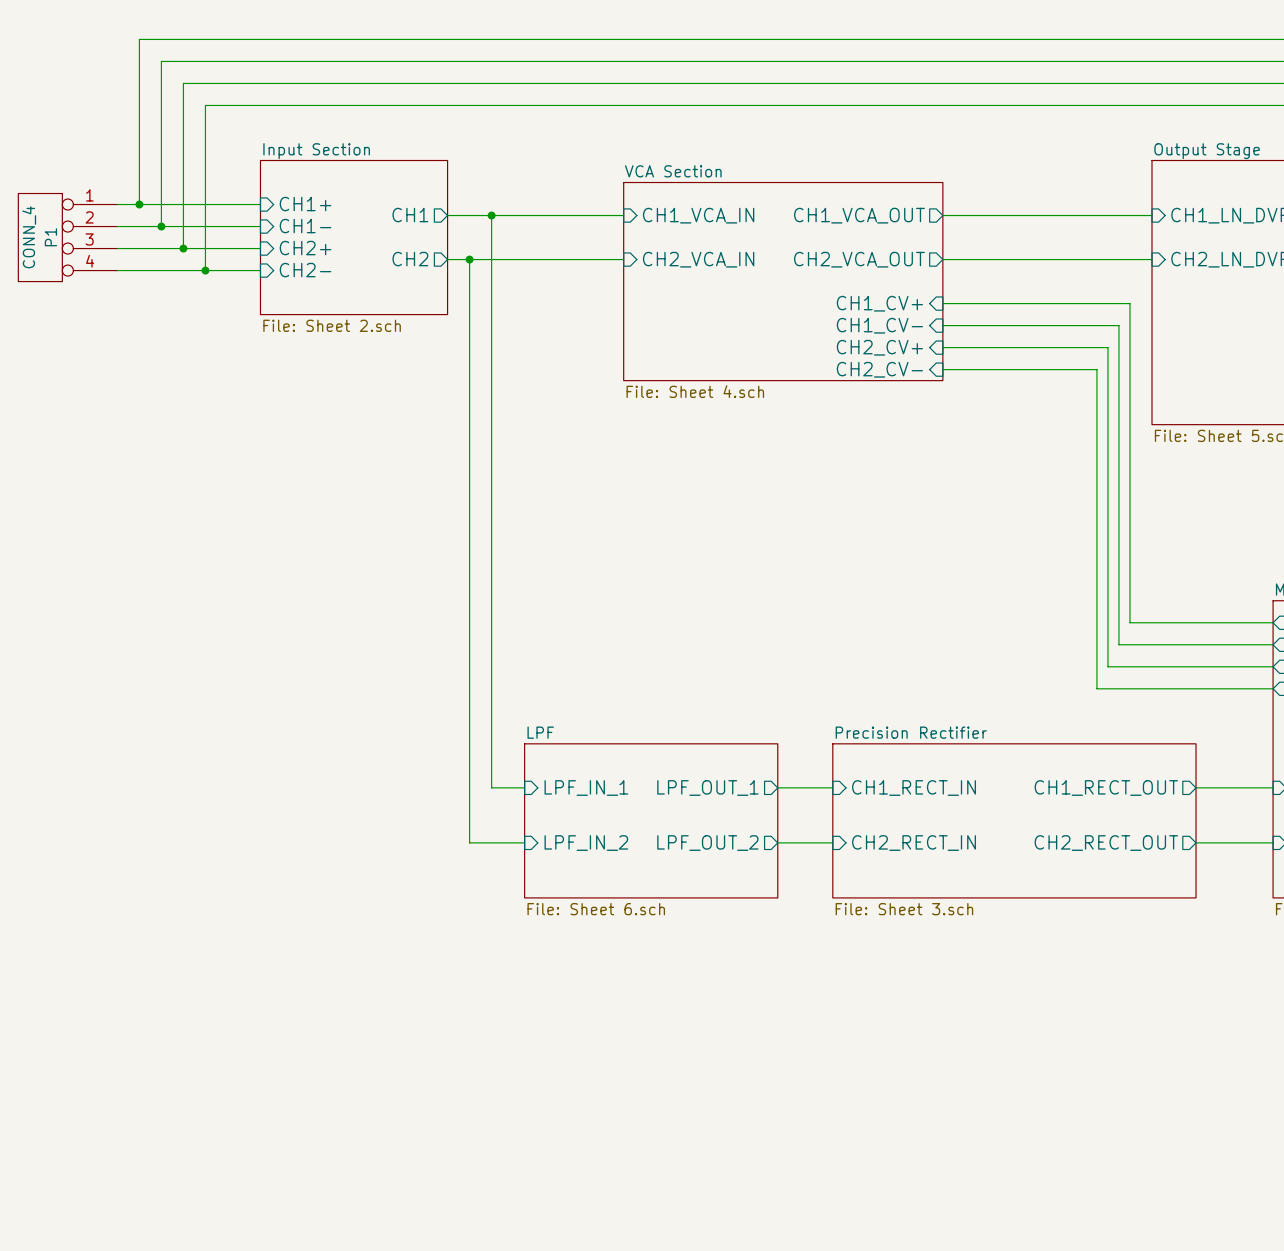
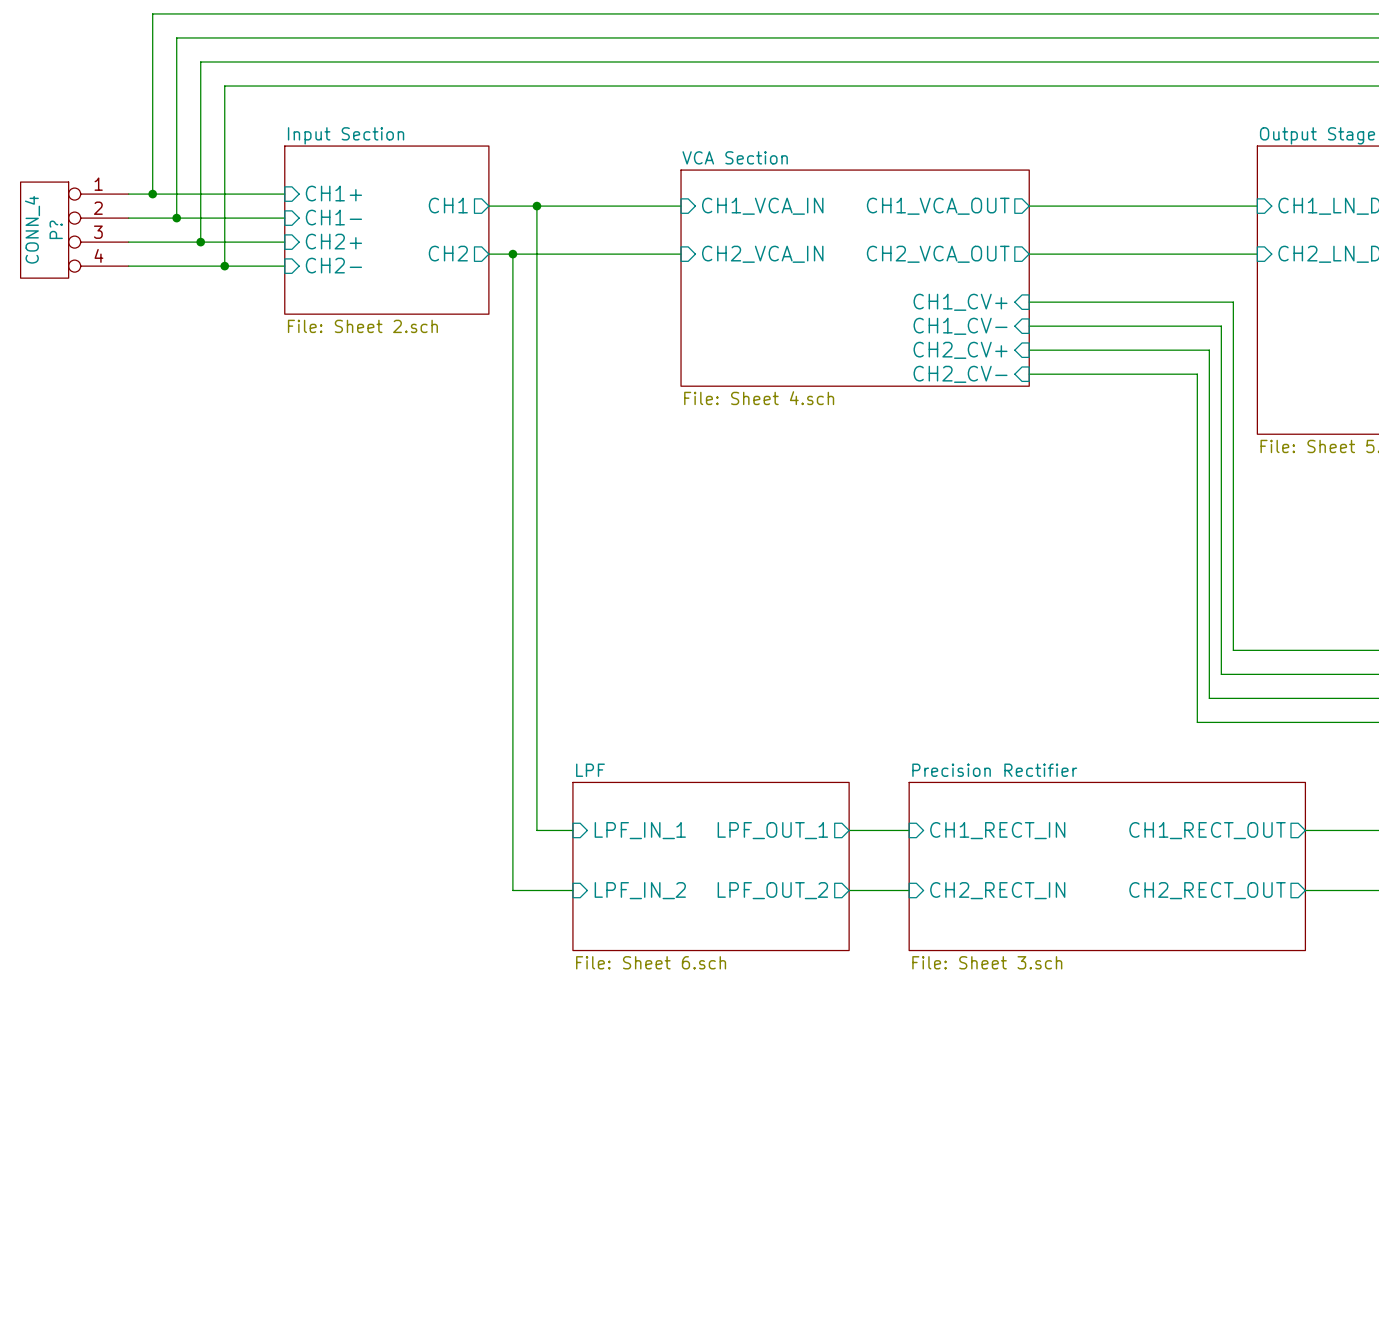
P1 name: P1 (50, 237) -> P? (56, 229)

